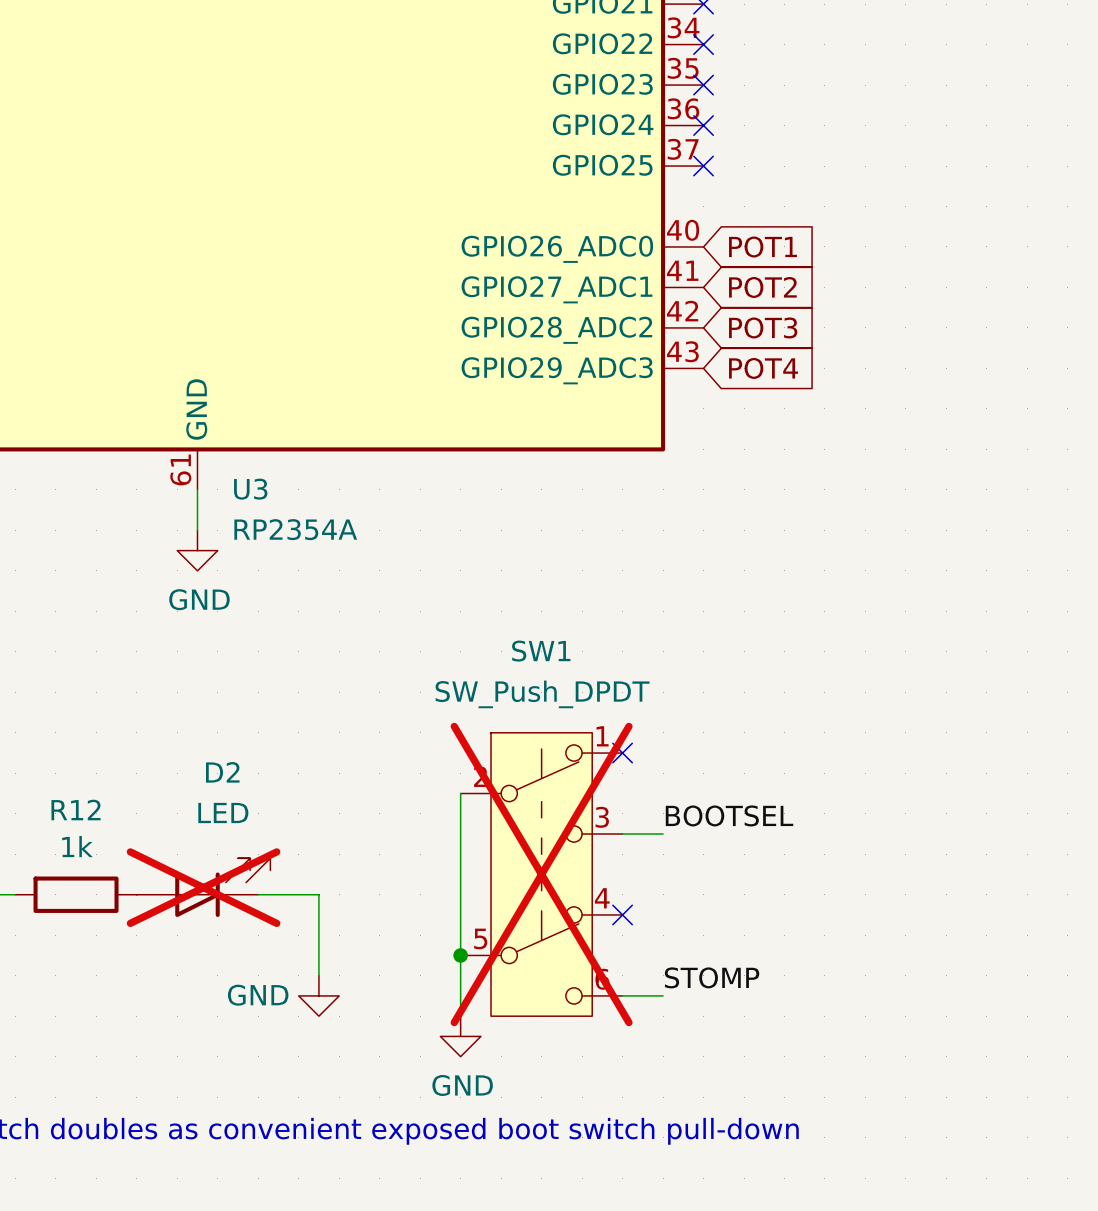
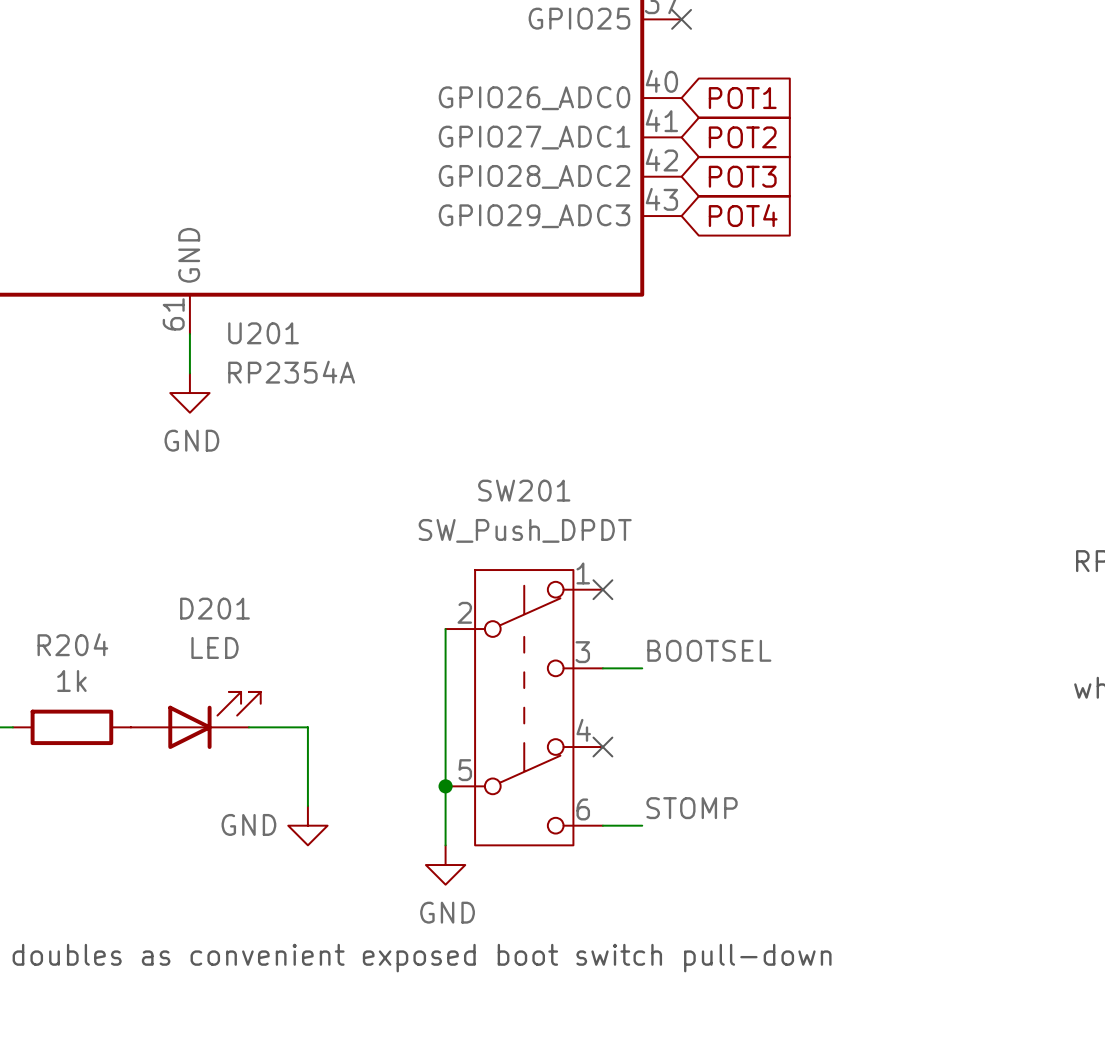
U3 name: U3 (250, 489) -> U201 (263, 333)
SW1 name: SW1 (541, 651) -> SW201 (524, 490)
D2 name: D2 (222, 772) -> D201 (214, 608)
R12 name: R12 (76, 809) -> R204 (72, 644)
SW1 do-not-place cross: (541, 874) -> none
D2 do-not-place cross: (203, 887) -> none

